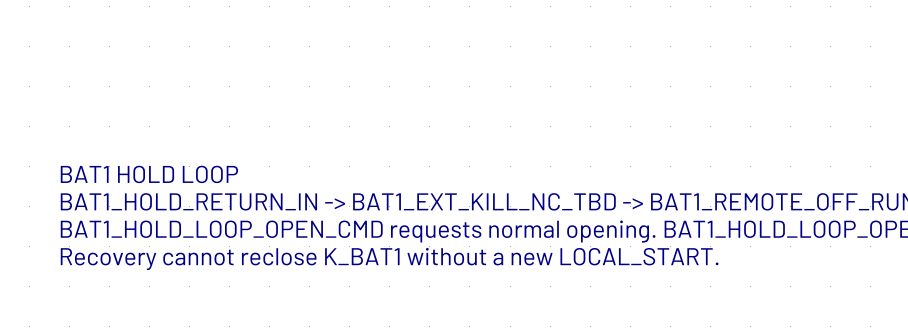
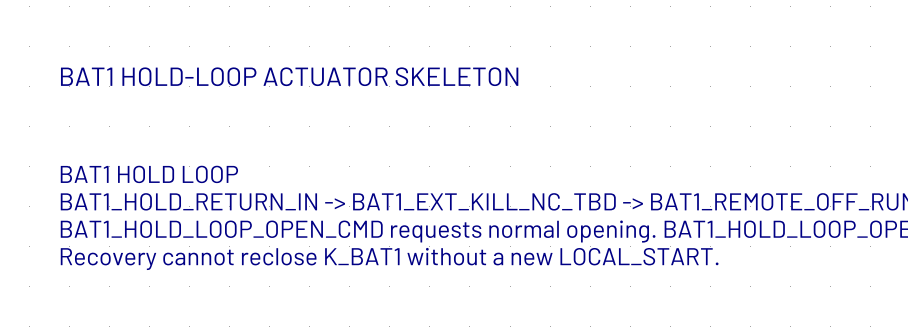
text: none -> BAT1 HOLD-LOOP ACTUATOR SKELETON (289, 76)

